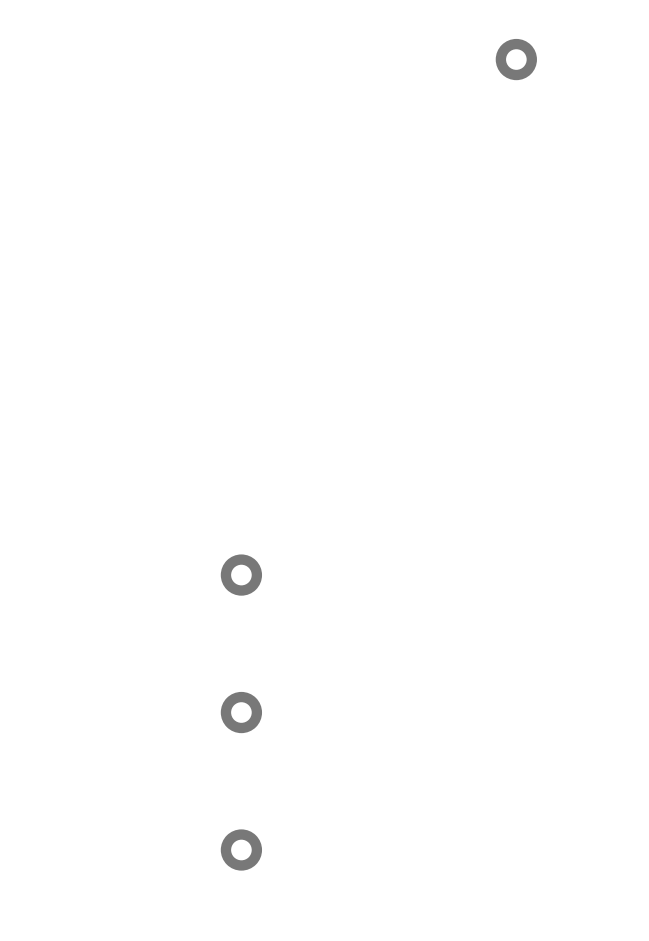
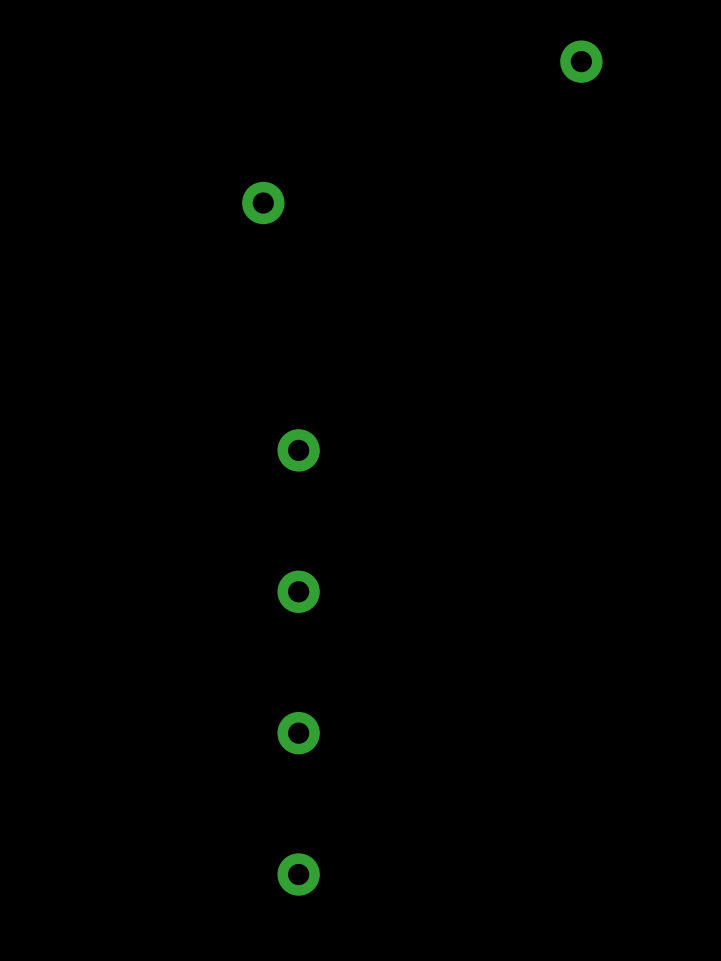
via: none -> (263, 203)
via: none -> (298, 450)

